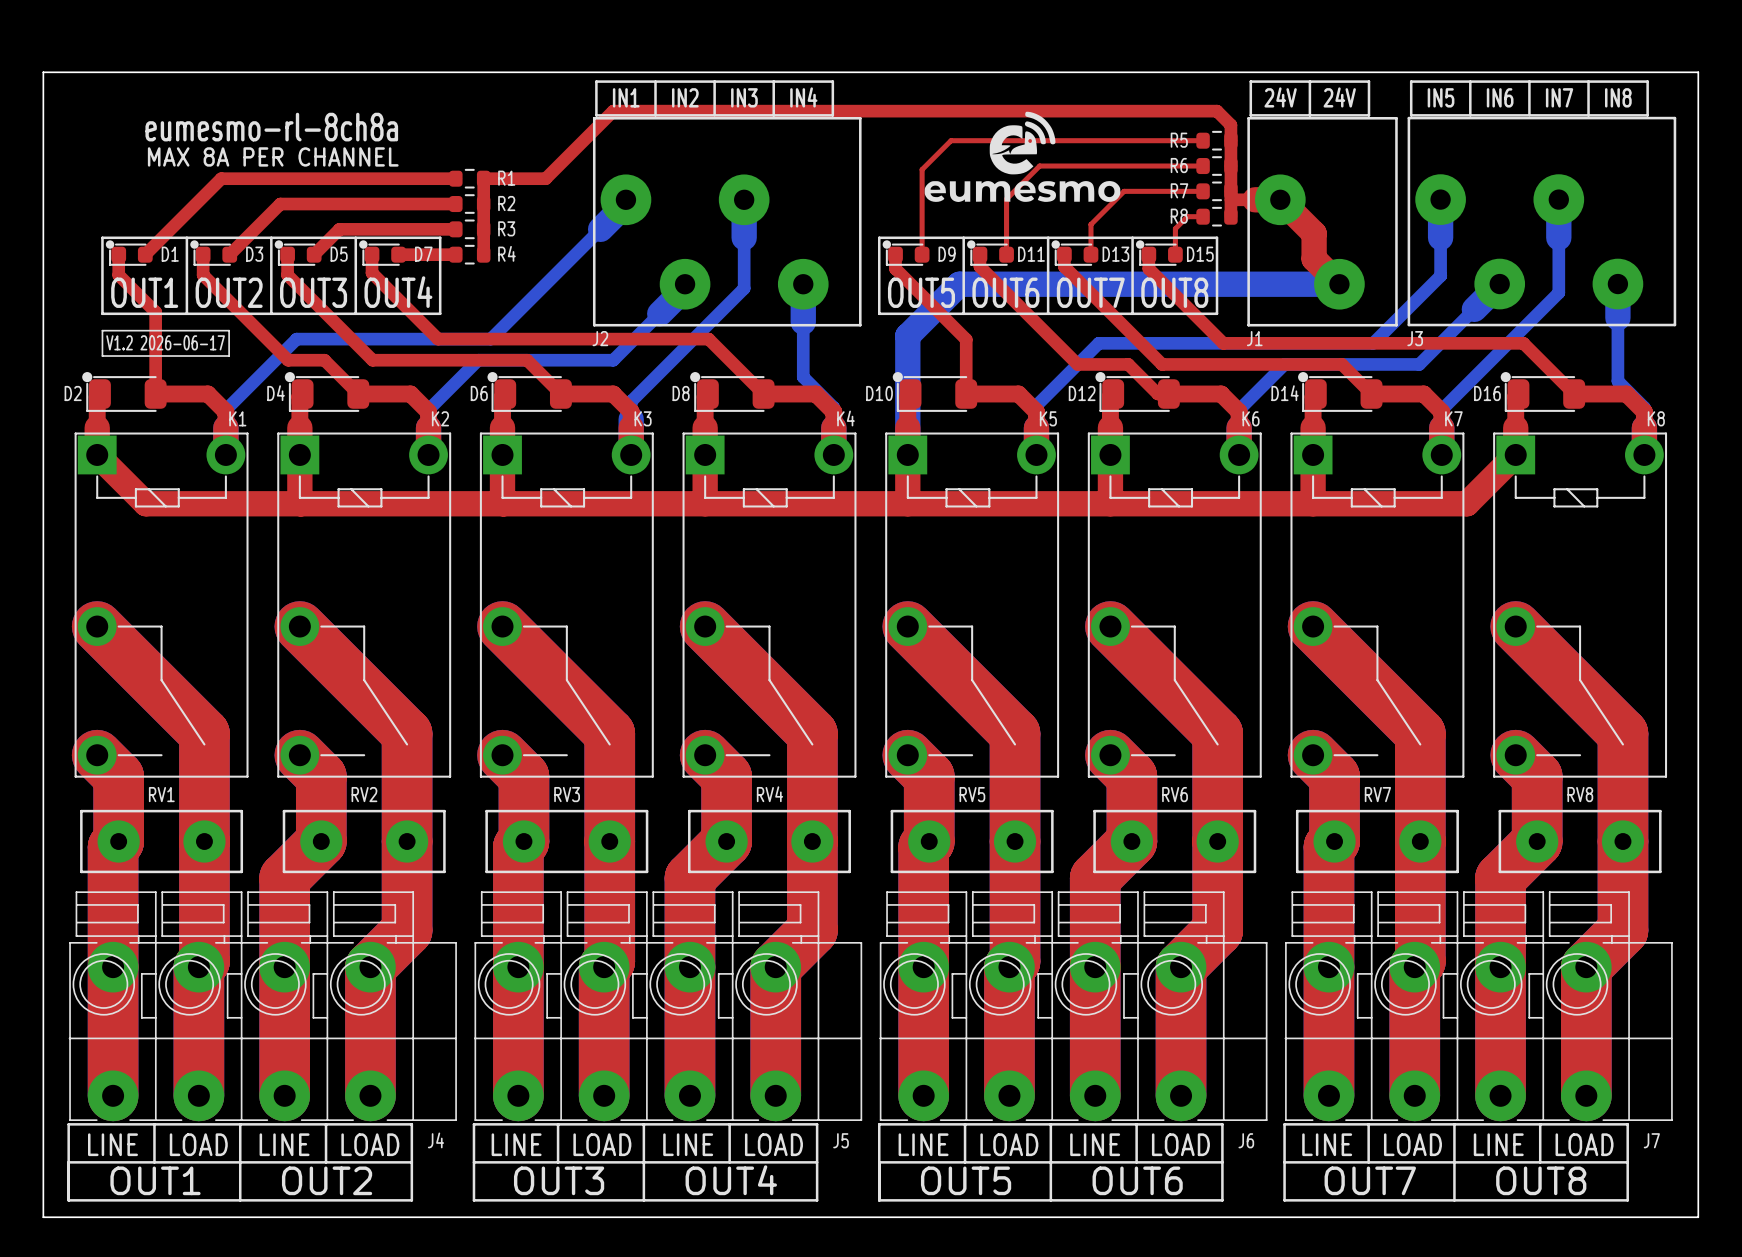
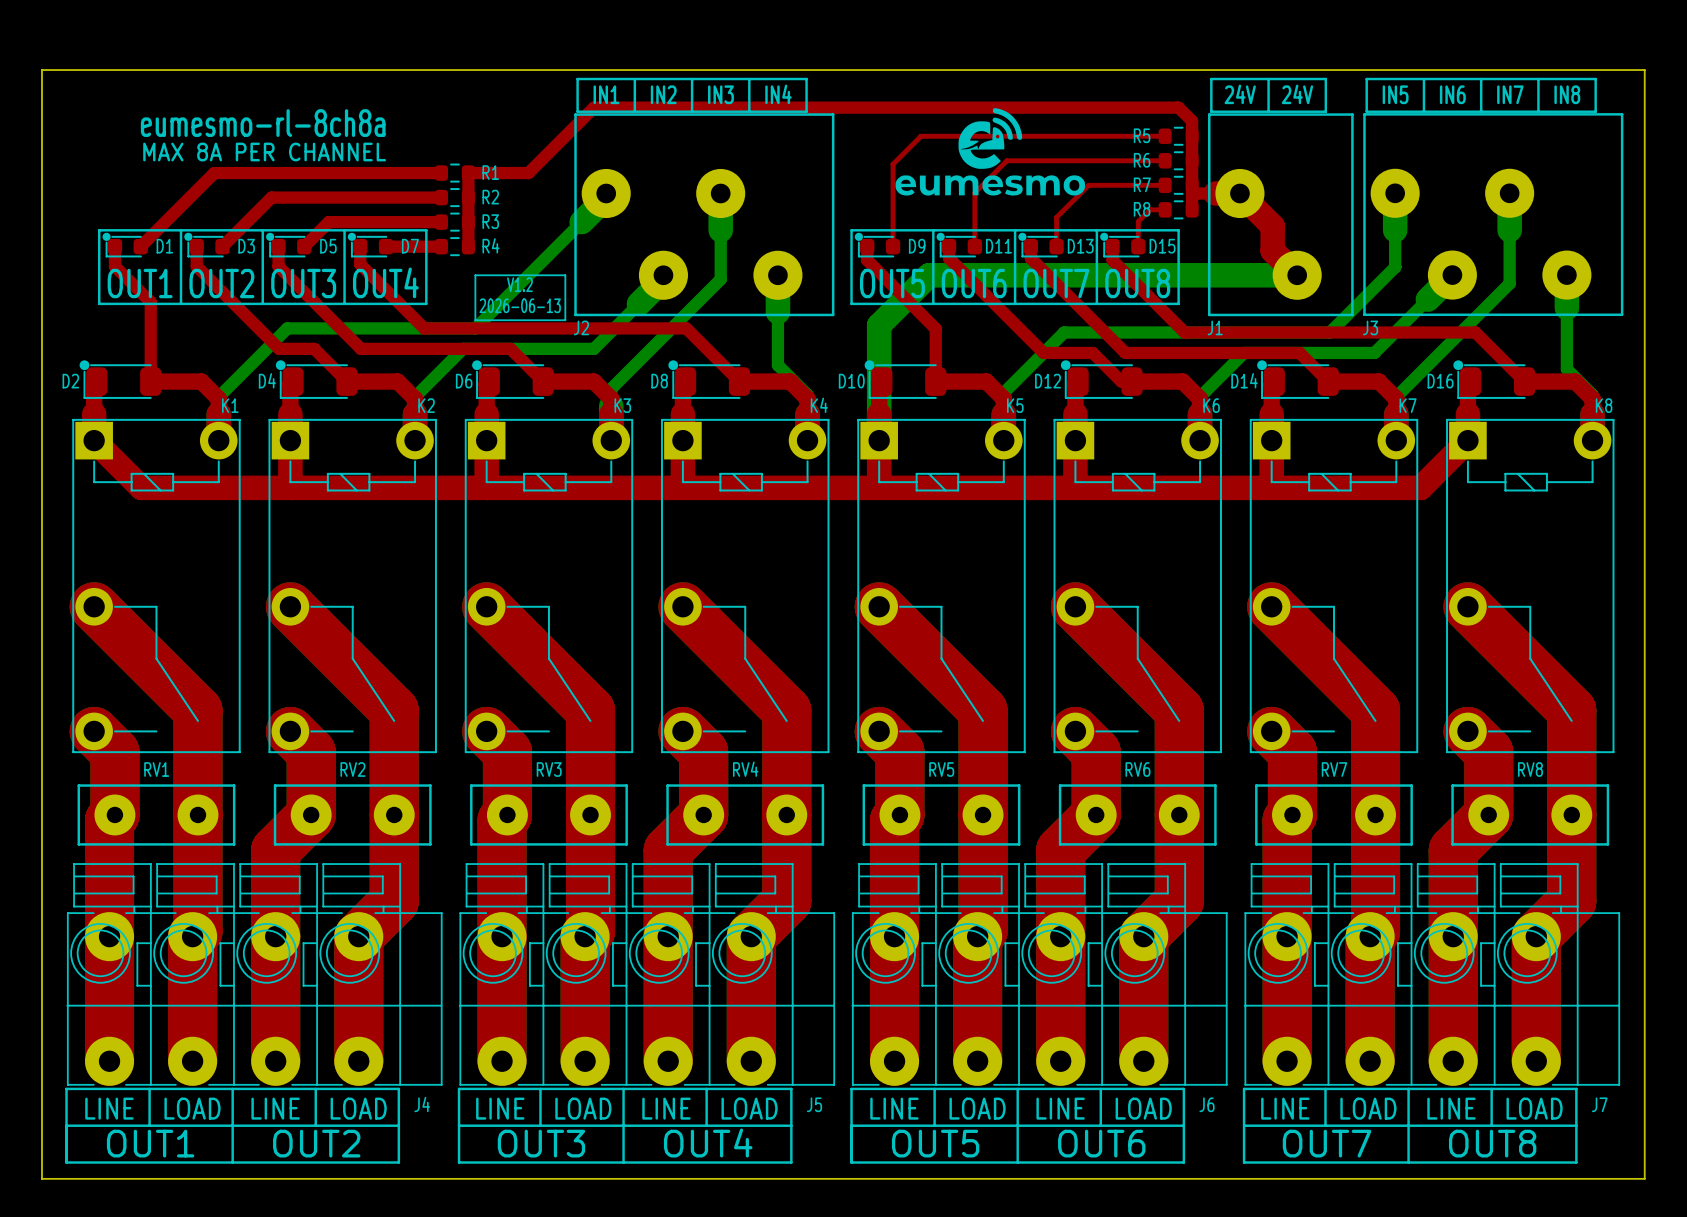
line: none -> (475, 275) (565, 275) (565, 320) (475, 320) (475, 275)
text: none -> V1.2 (519, 284)
text: none -> 2026-06-13 (520, 305)
line: (102, 330) (229, 330) (229, 356) (102, 356) (102, 330) -> none
text: V1.2 2026-06-17 (165, 342) -> none

